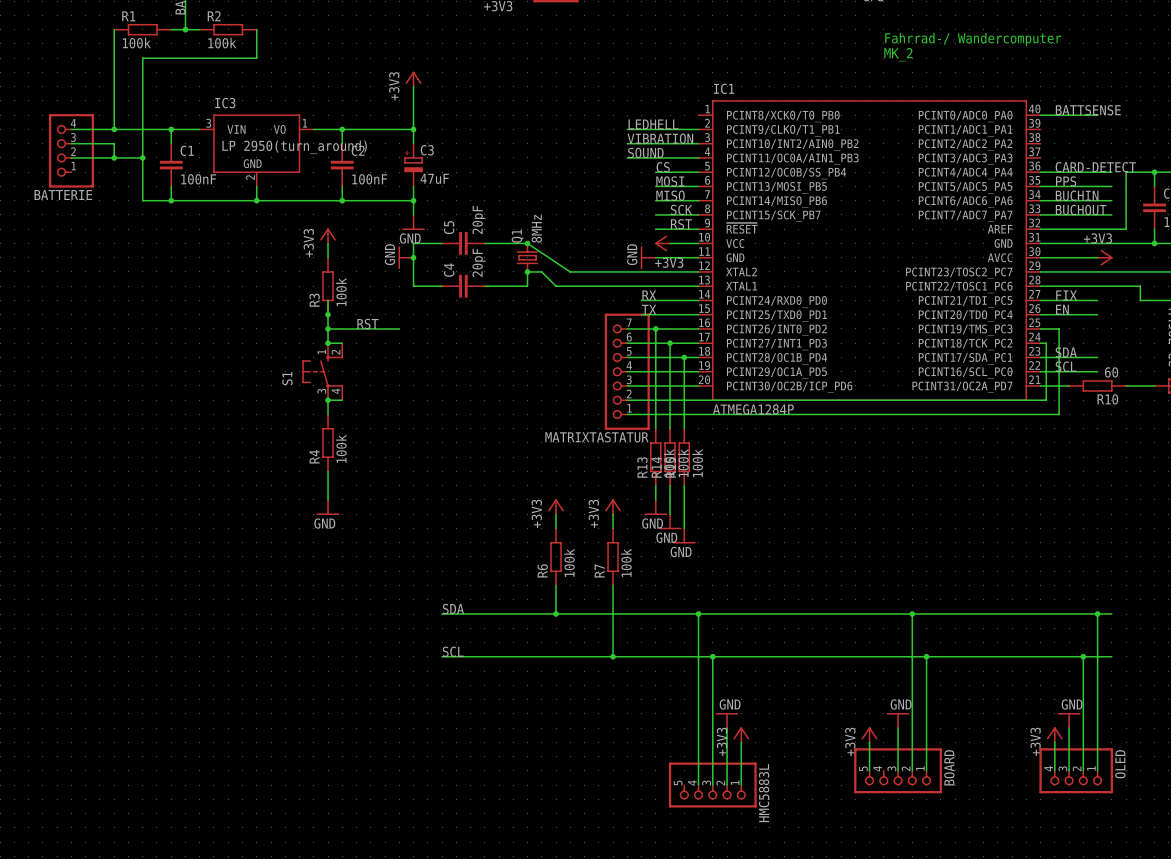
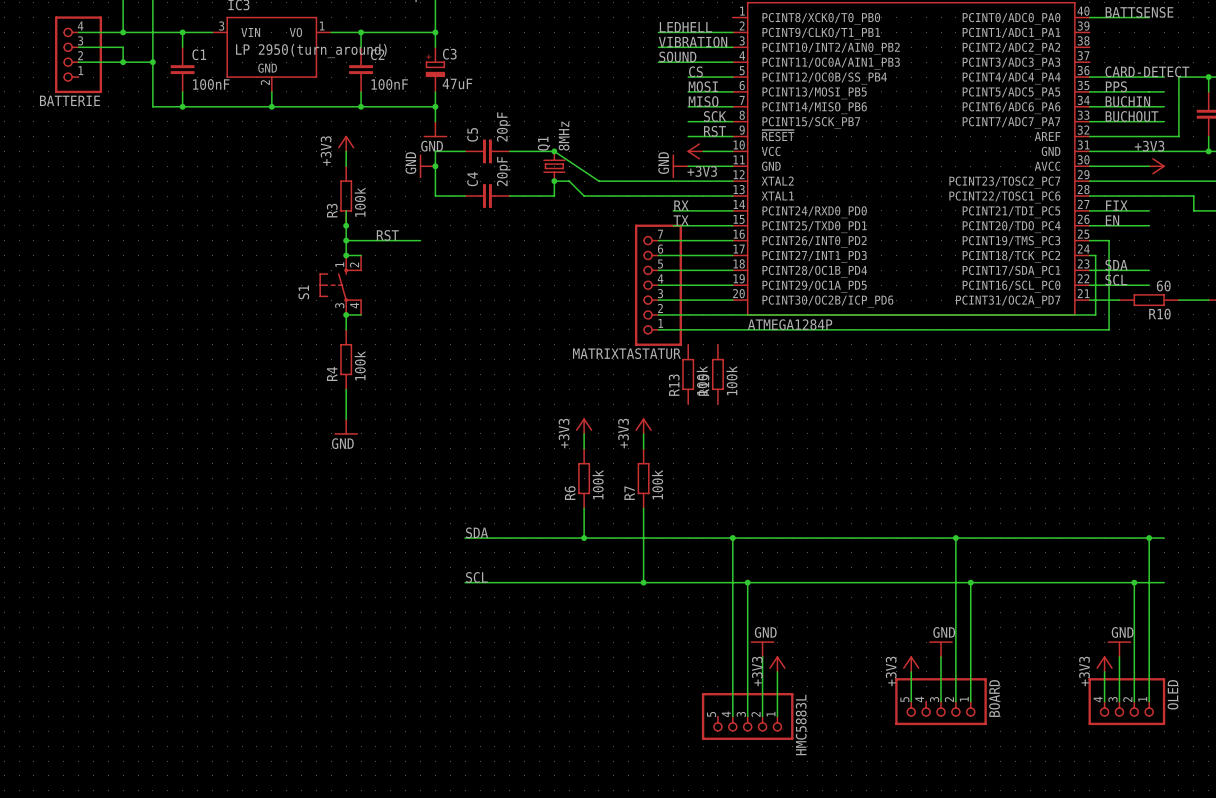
wire: (655, 328) (655, 428) -> none
junction: (655, 328) -> none
wire: (670, 343) (670, 428) -> none
junction: (670, 343) -> none
wire: (684, 357) (684, 428) -> none
junction: (684, 357) -> none
R14: 100k (670, 457) -> none
wire: (655, 485) (655, 499) -> none
wire: (670, 485) (670, 514) -> none
wire: (684, 485) (684, 528) -> none
power symbol: GND (655, 507) -> none
power symbol: GND (670, 521) -> none
power symbol: GND (684, 535) -> none

